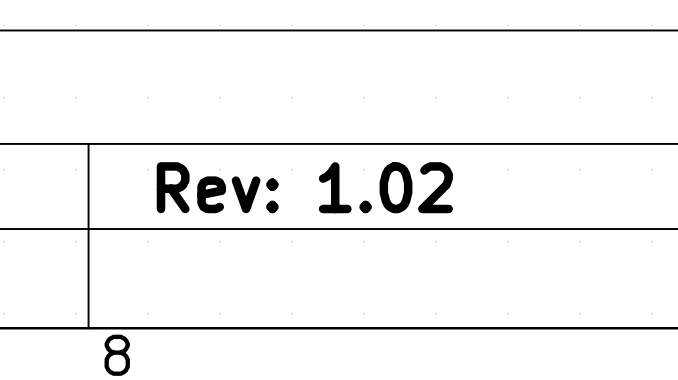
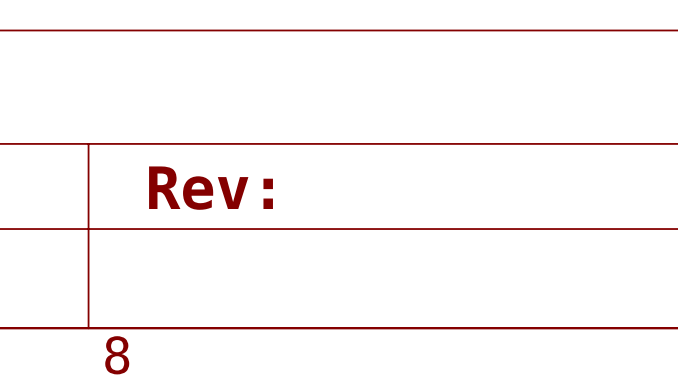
title block: Rev: 1.02 (304, 187) -> Rev: (211, 188)

